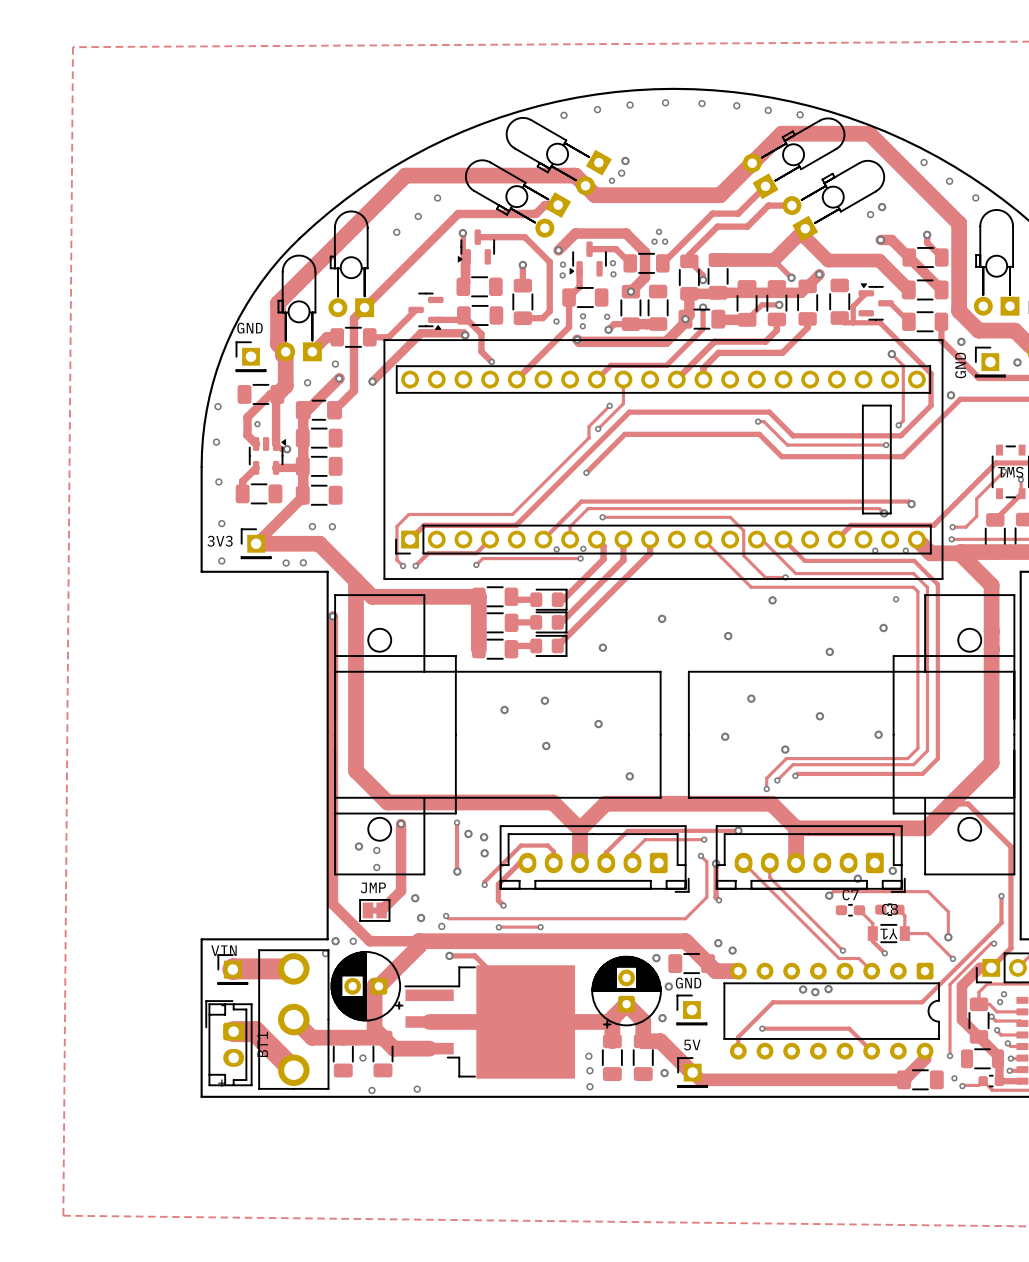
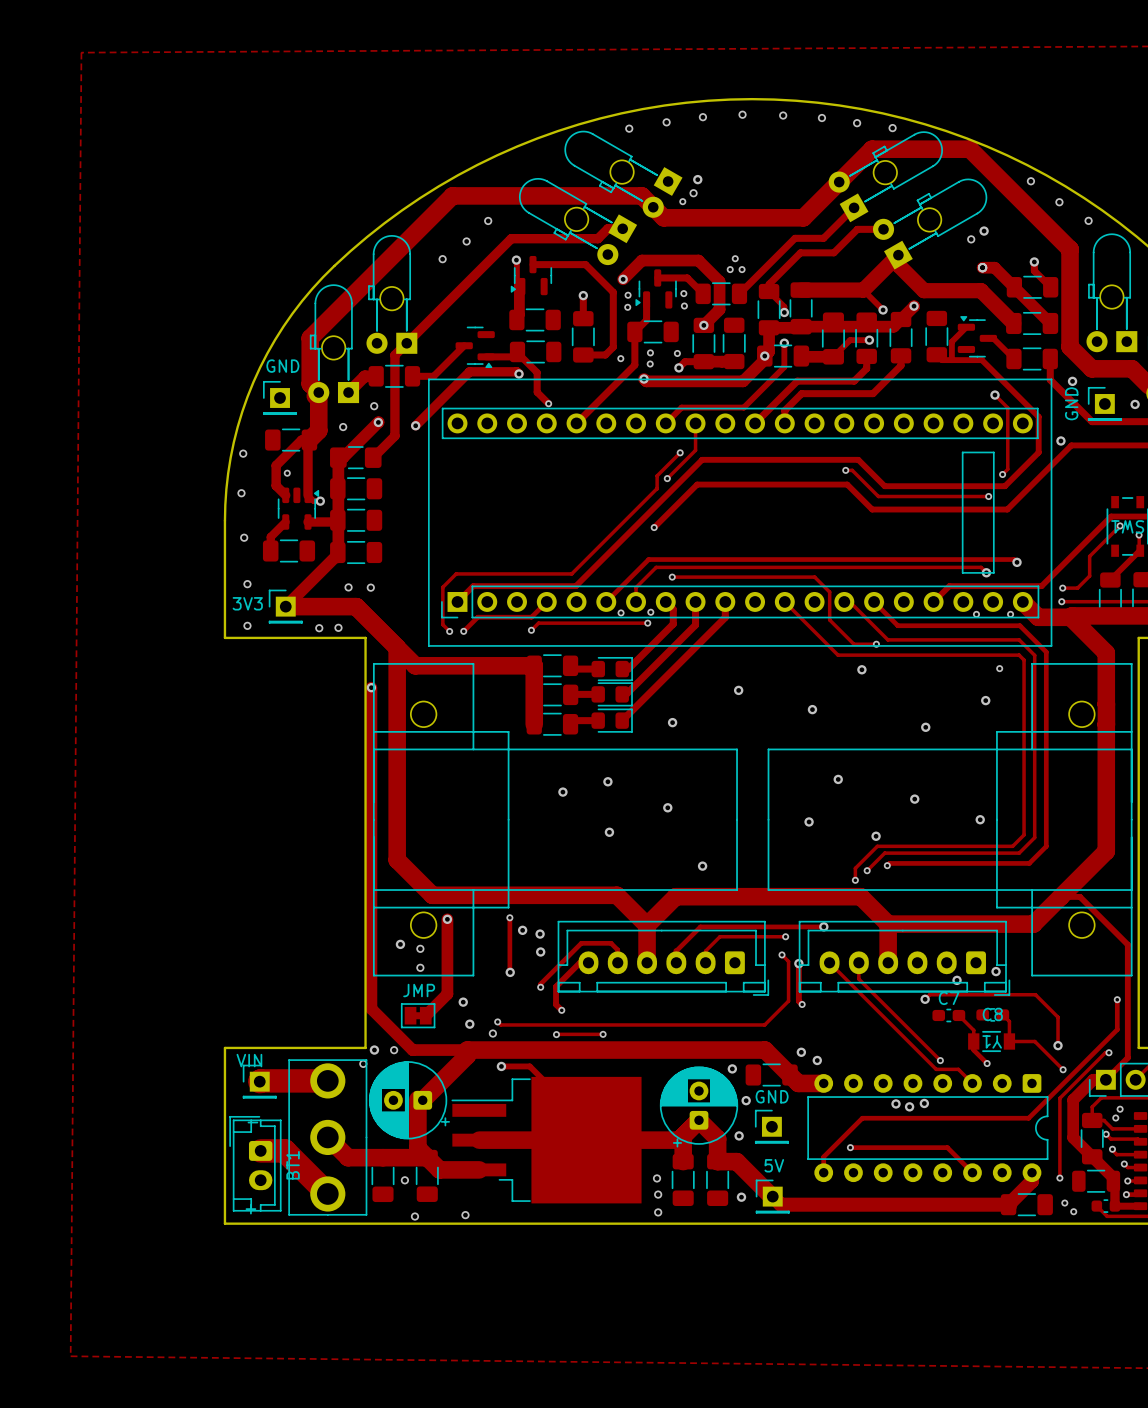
track: (983, 1081) (978, 1085) (962, 1086) -> none

